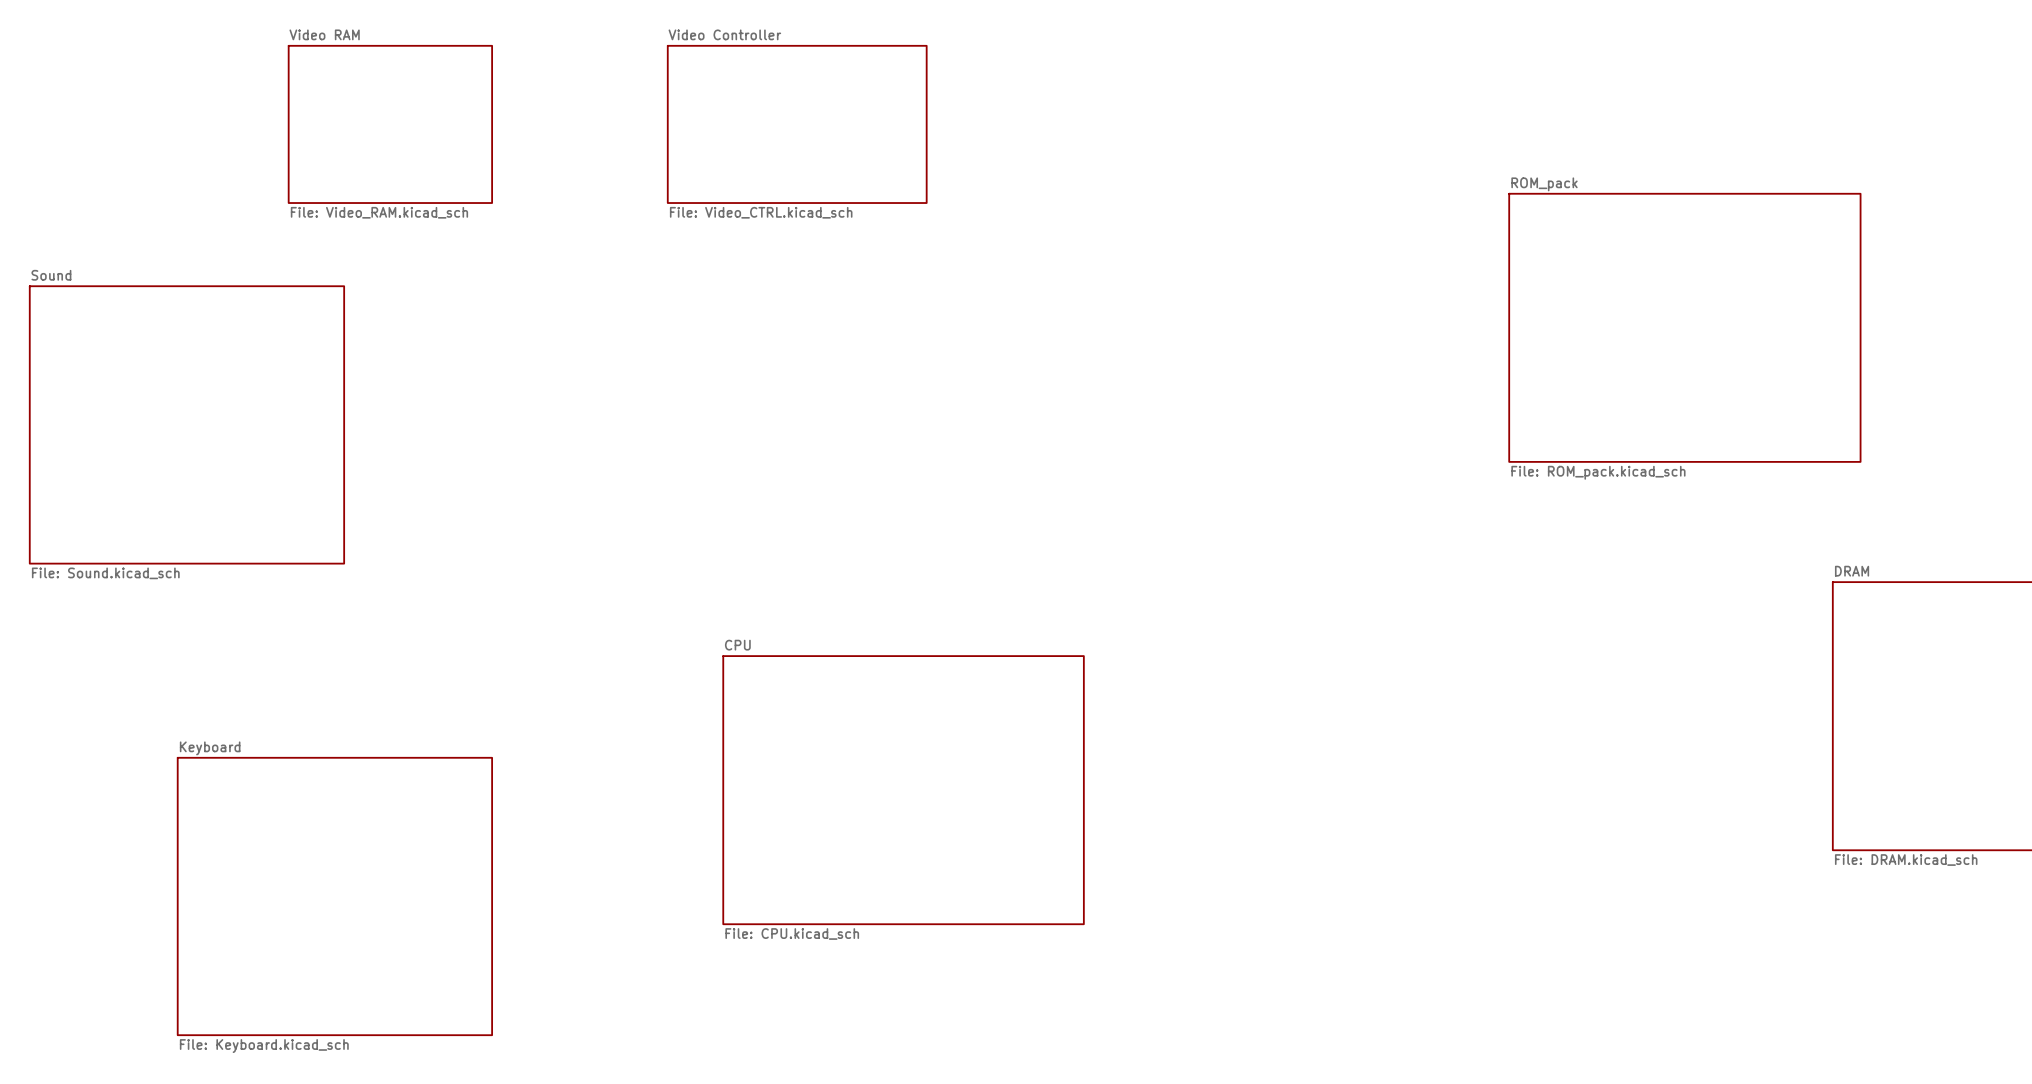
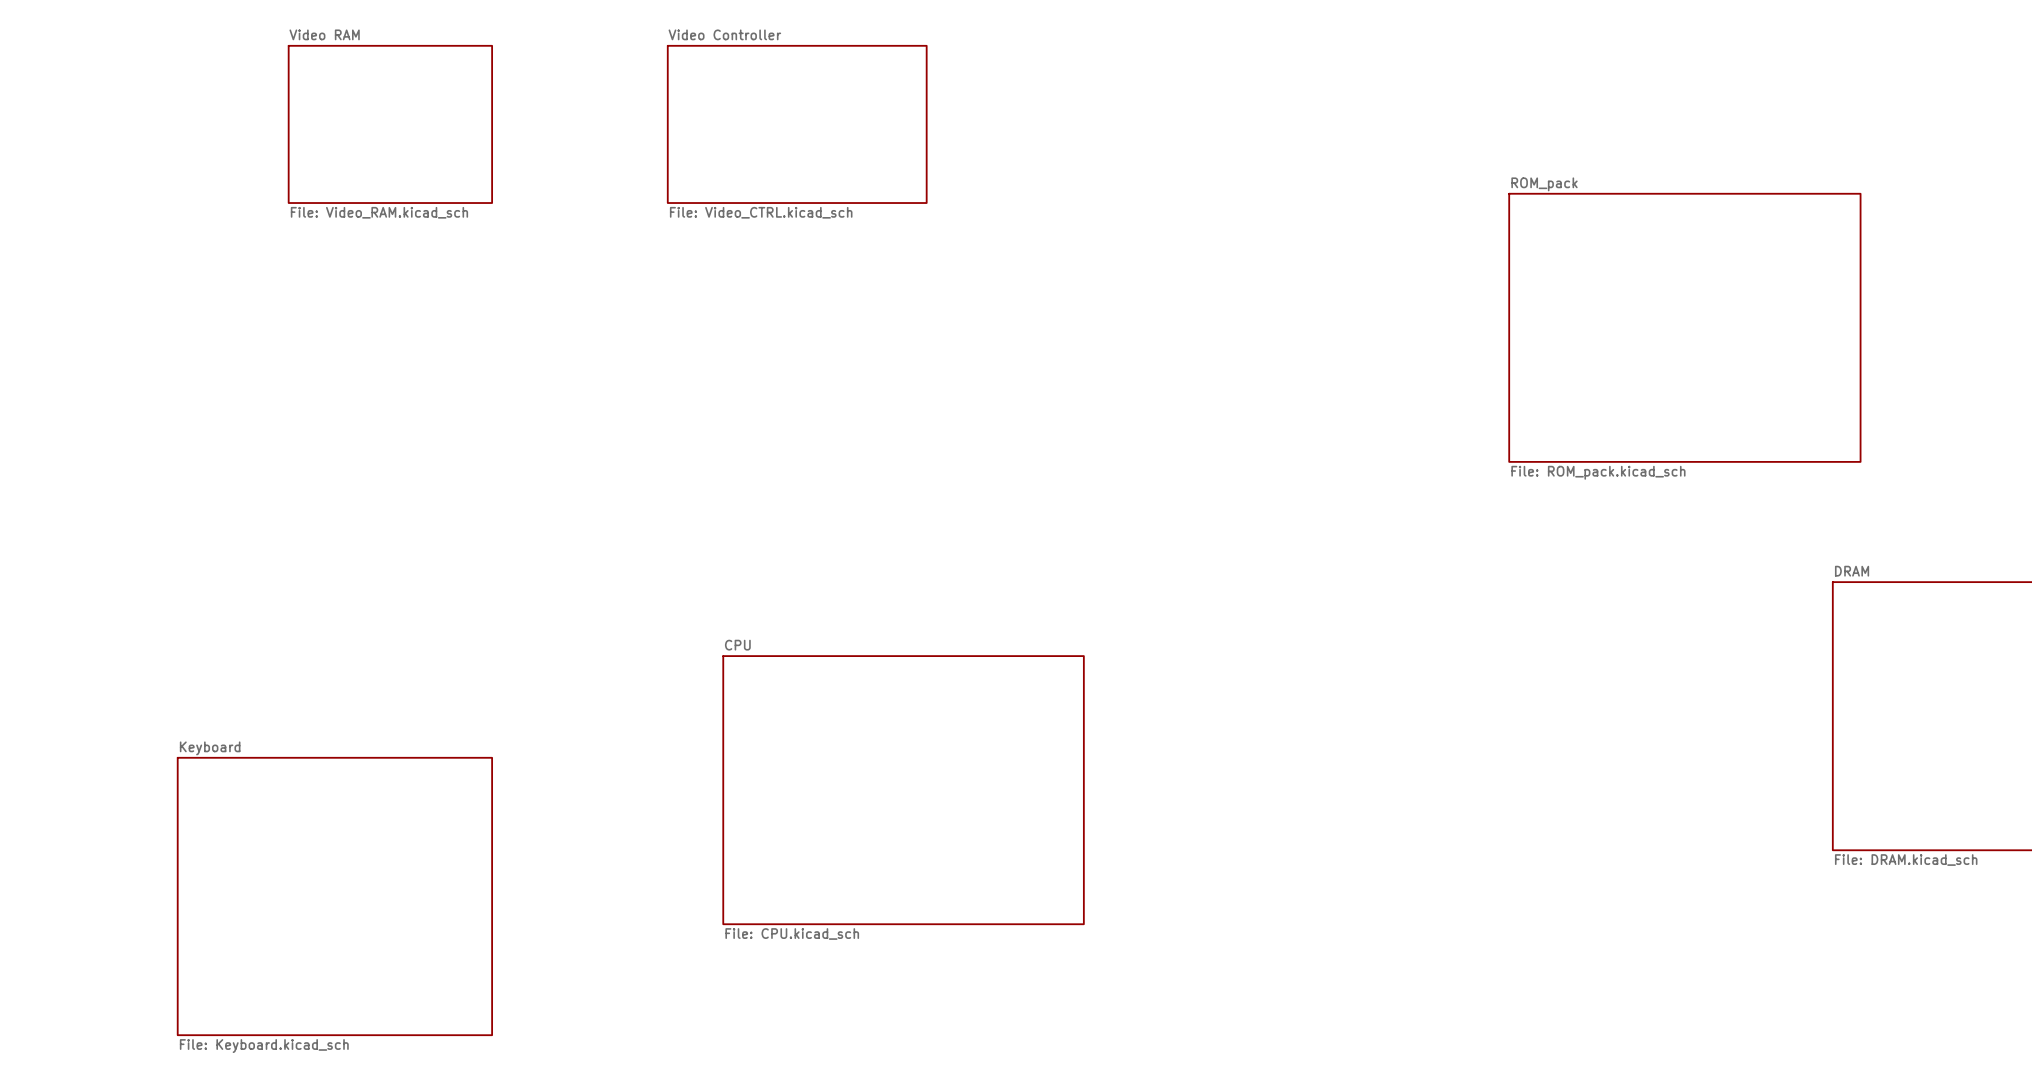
sheet Sound: File: Sound.kicad_sch (186, 424) -> none

